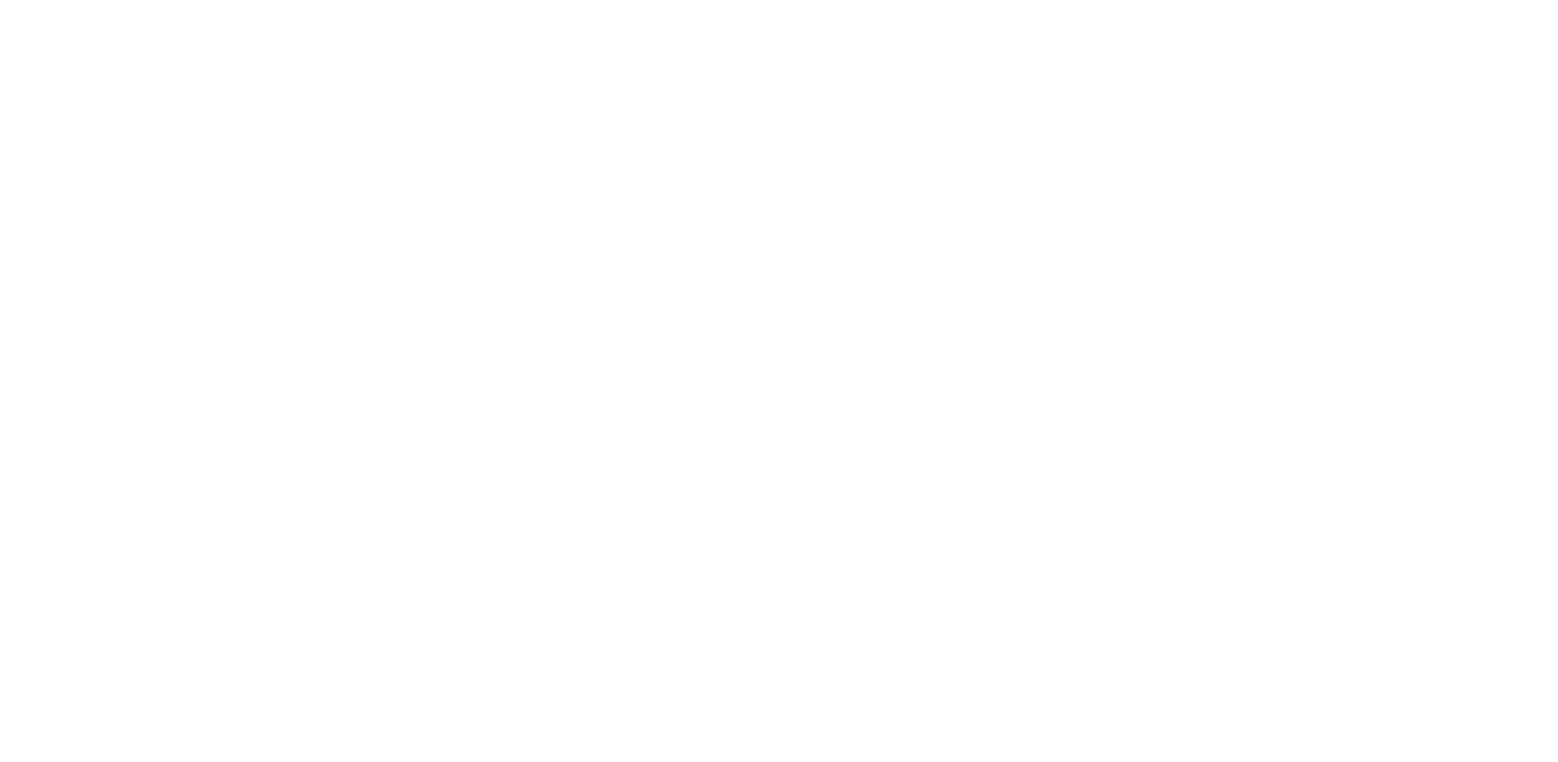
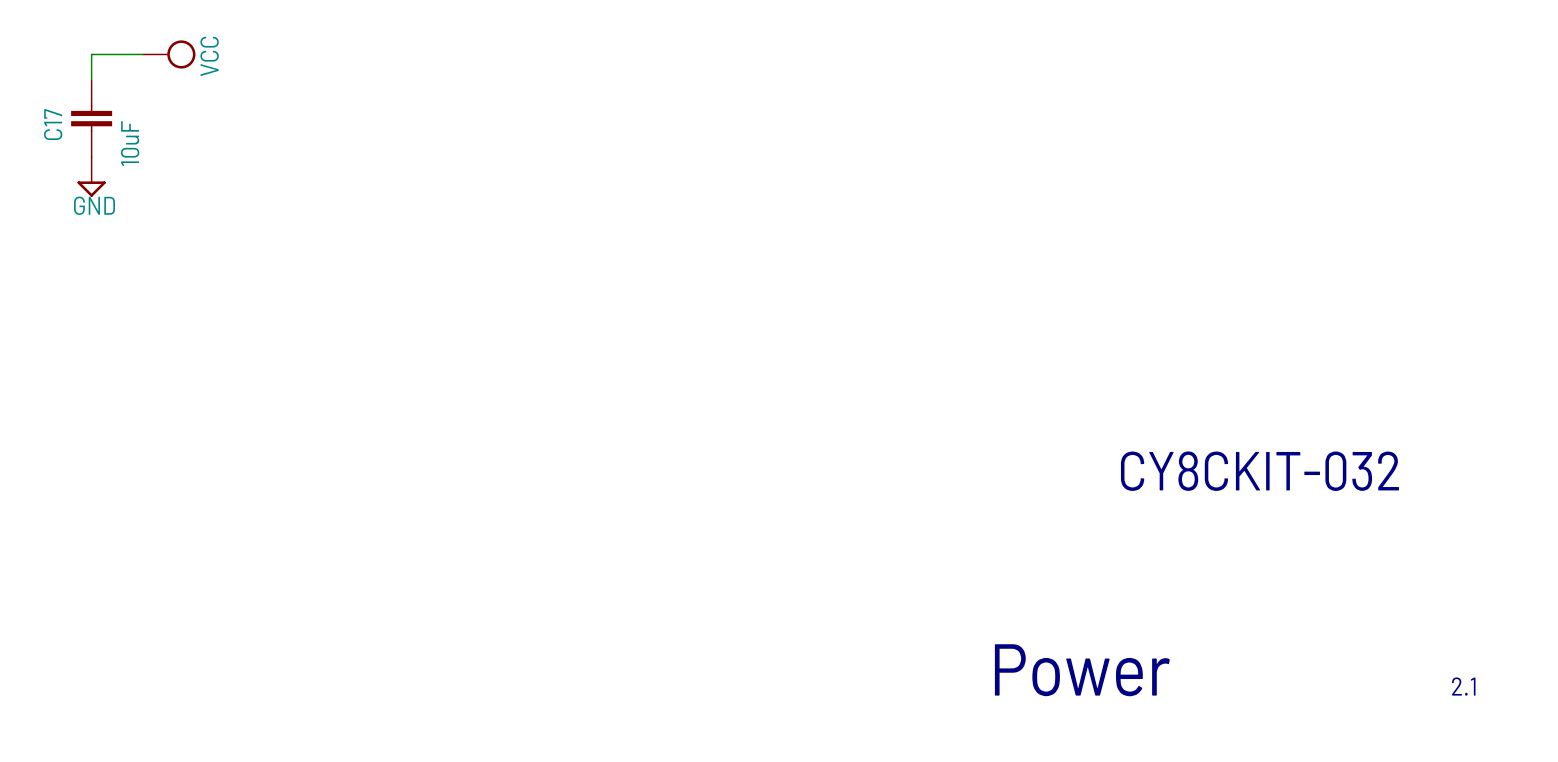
wire: none -> (142, 54) (91, 54) (91, 80)
power symbol: none -> VCC (169, 54)
C17: none -> 10uF (91, 118)
power symbol: none -> GND (91, 176)
text: none -> CY8CKIT-032 (1259, 471)
text: none -> Power (1082, 670)
text: none -> 2.1 (1463, 686)

